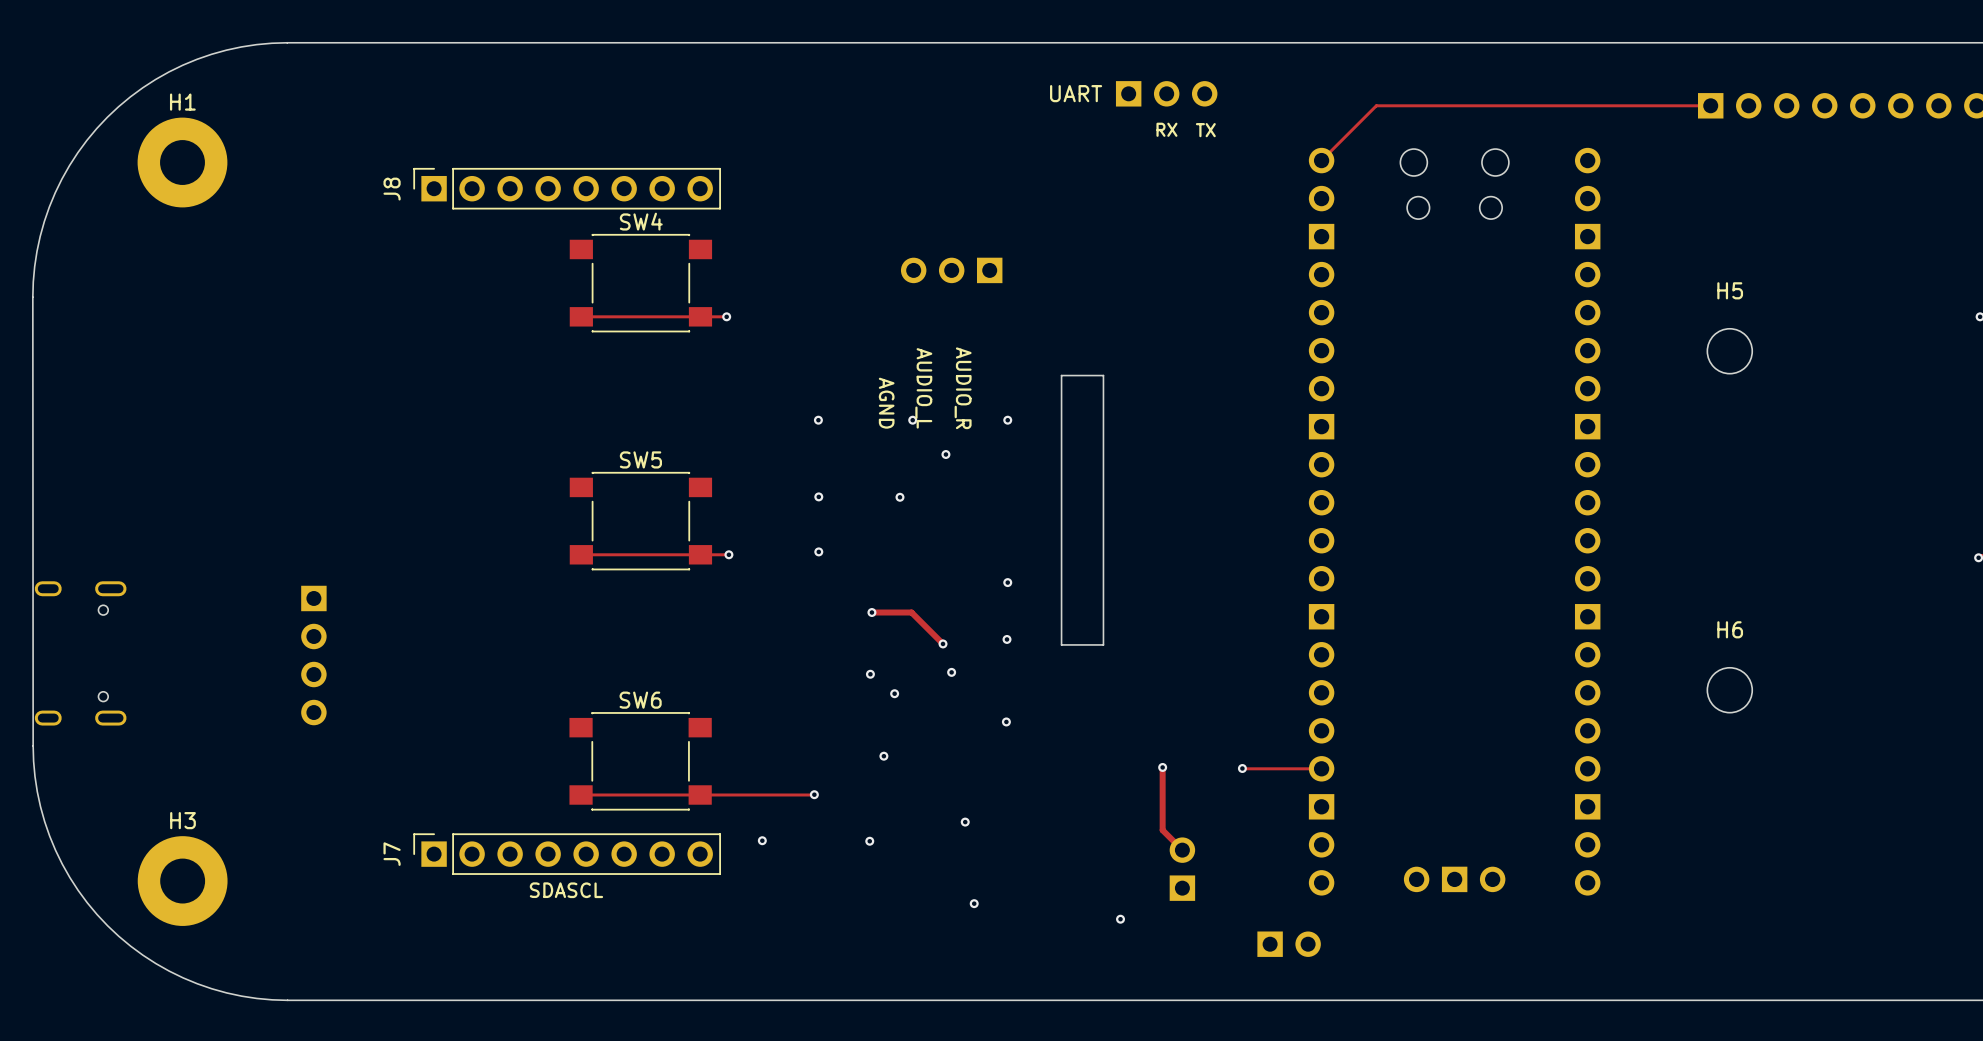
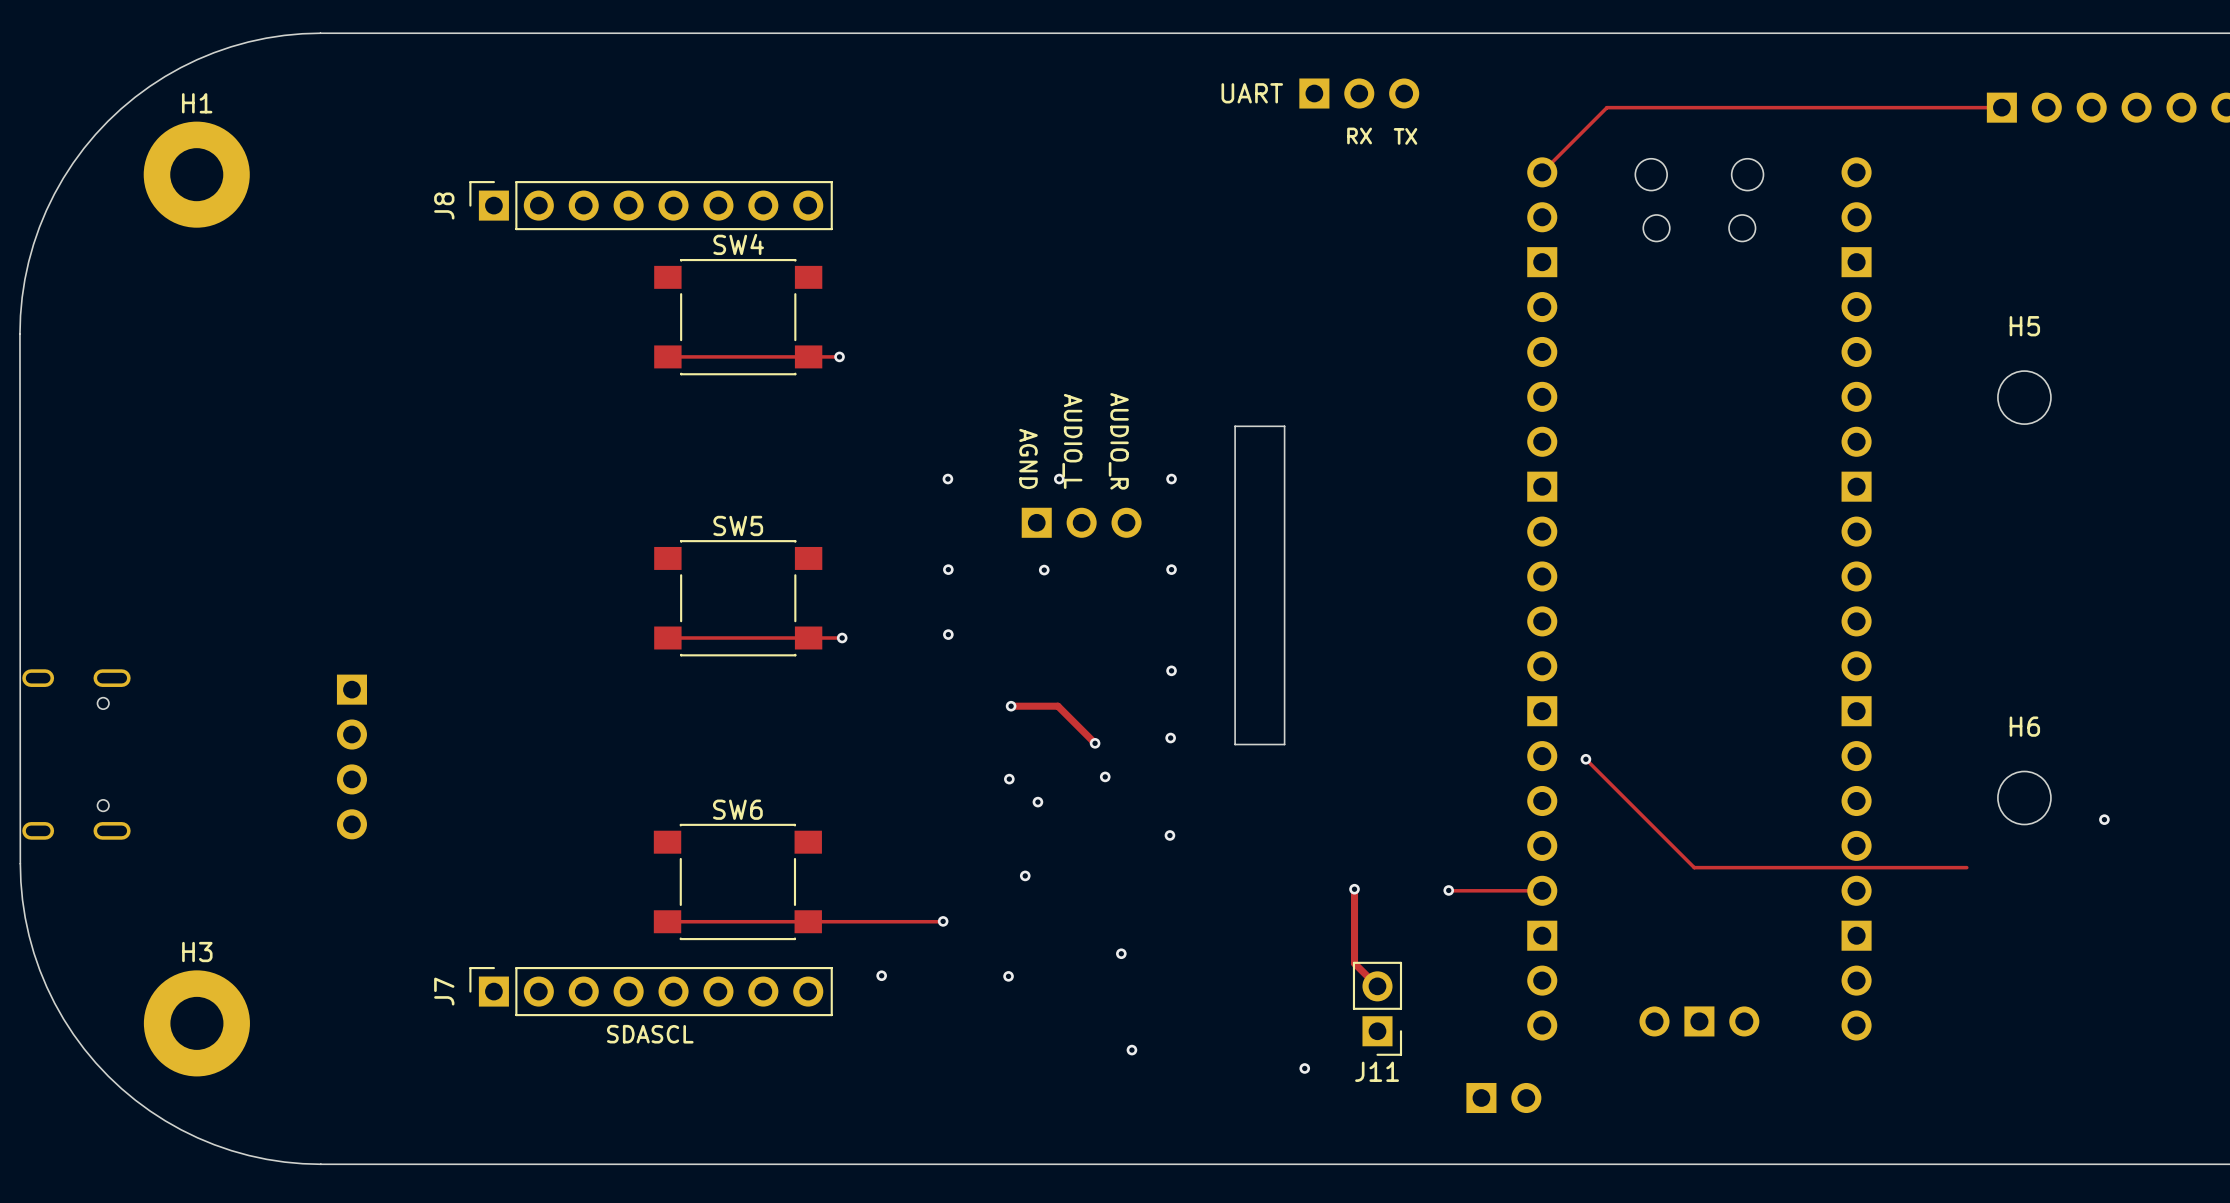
part rotation: 0° (951, 270) -> 180° (1081, 522)
part position: (951, 270) -> (1081, 522)
via position: (945, 454) -> (1171, 569)
track: none -> (1585, 759) (1694, 867) (1966, 867)
via: none -> (1585, 759)
via: none -> (2104, 819)
J11: none -> (1377, 1008)
part: (1182, 869) -> none

